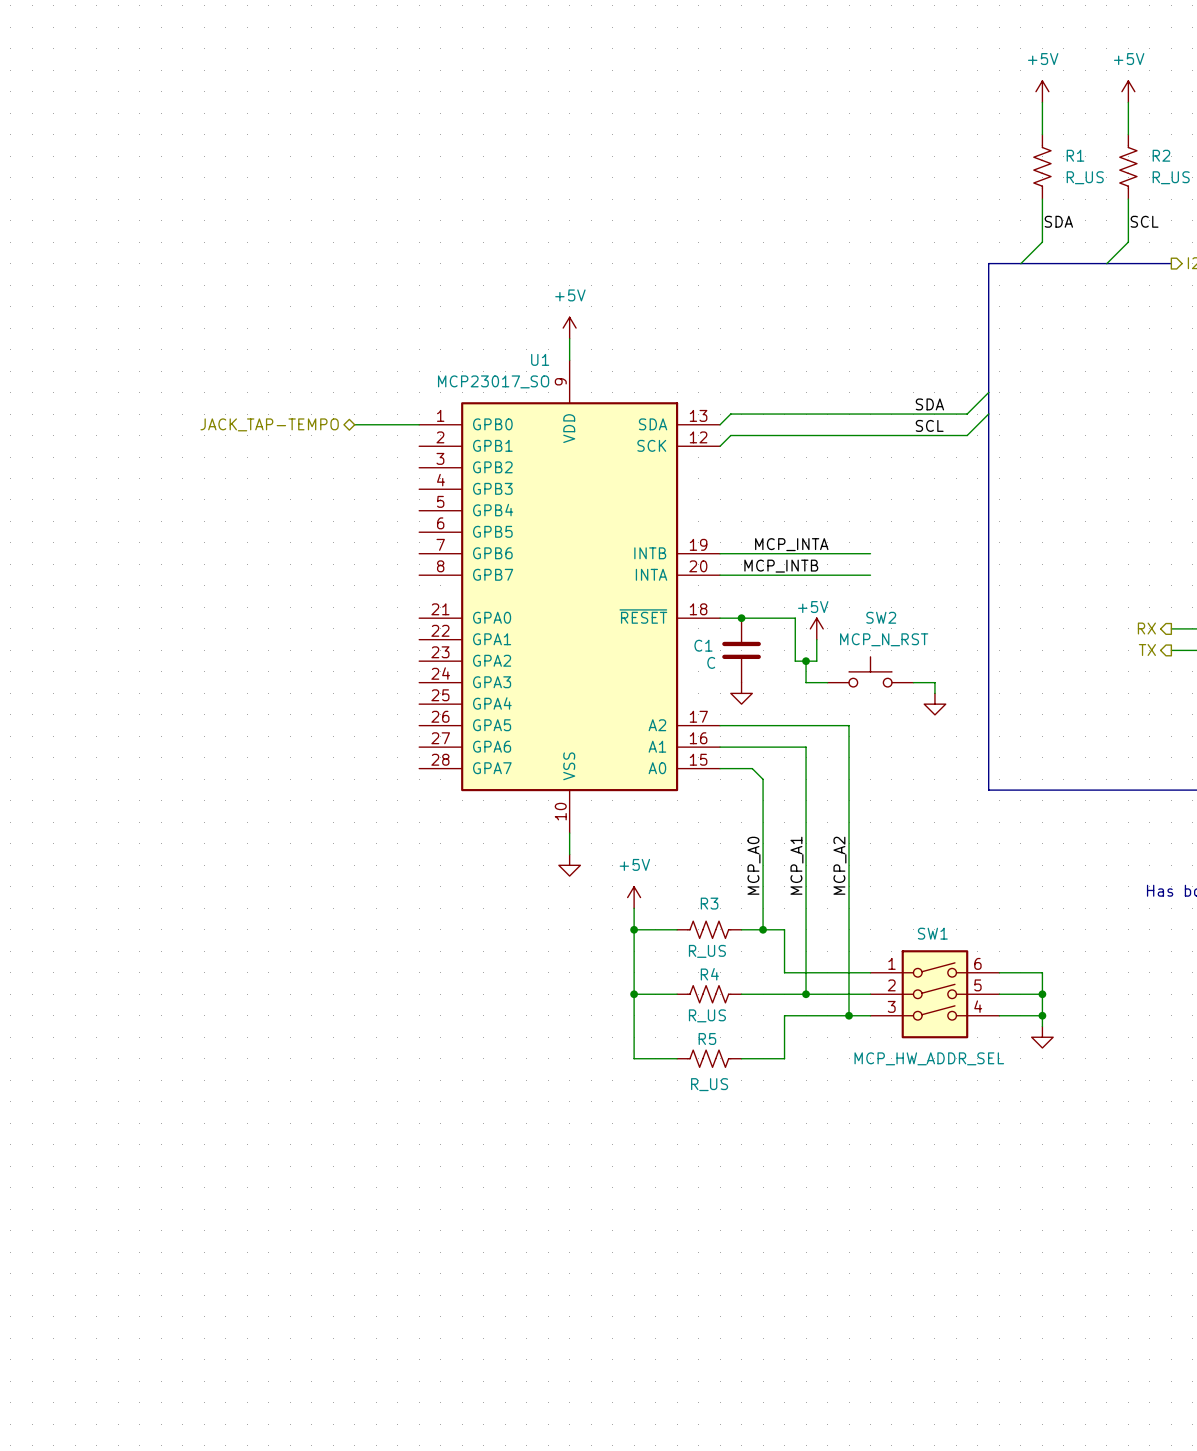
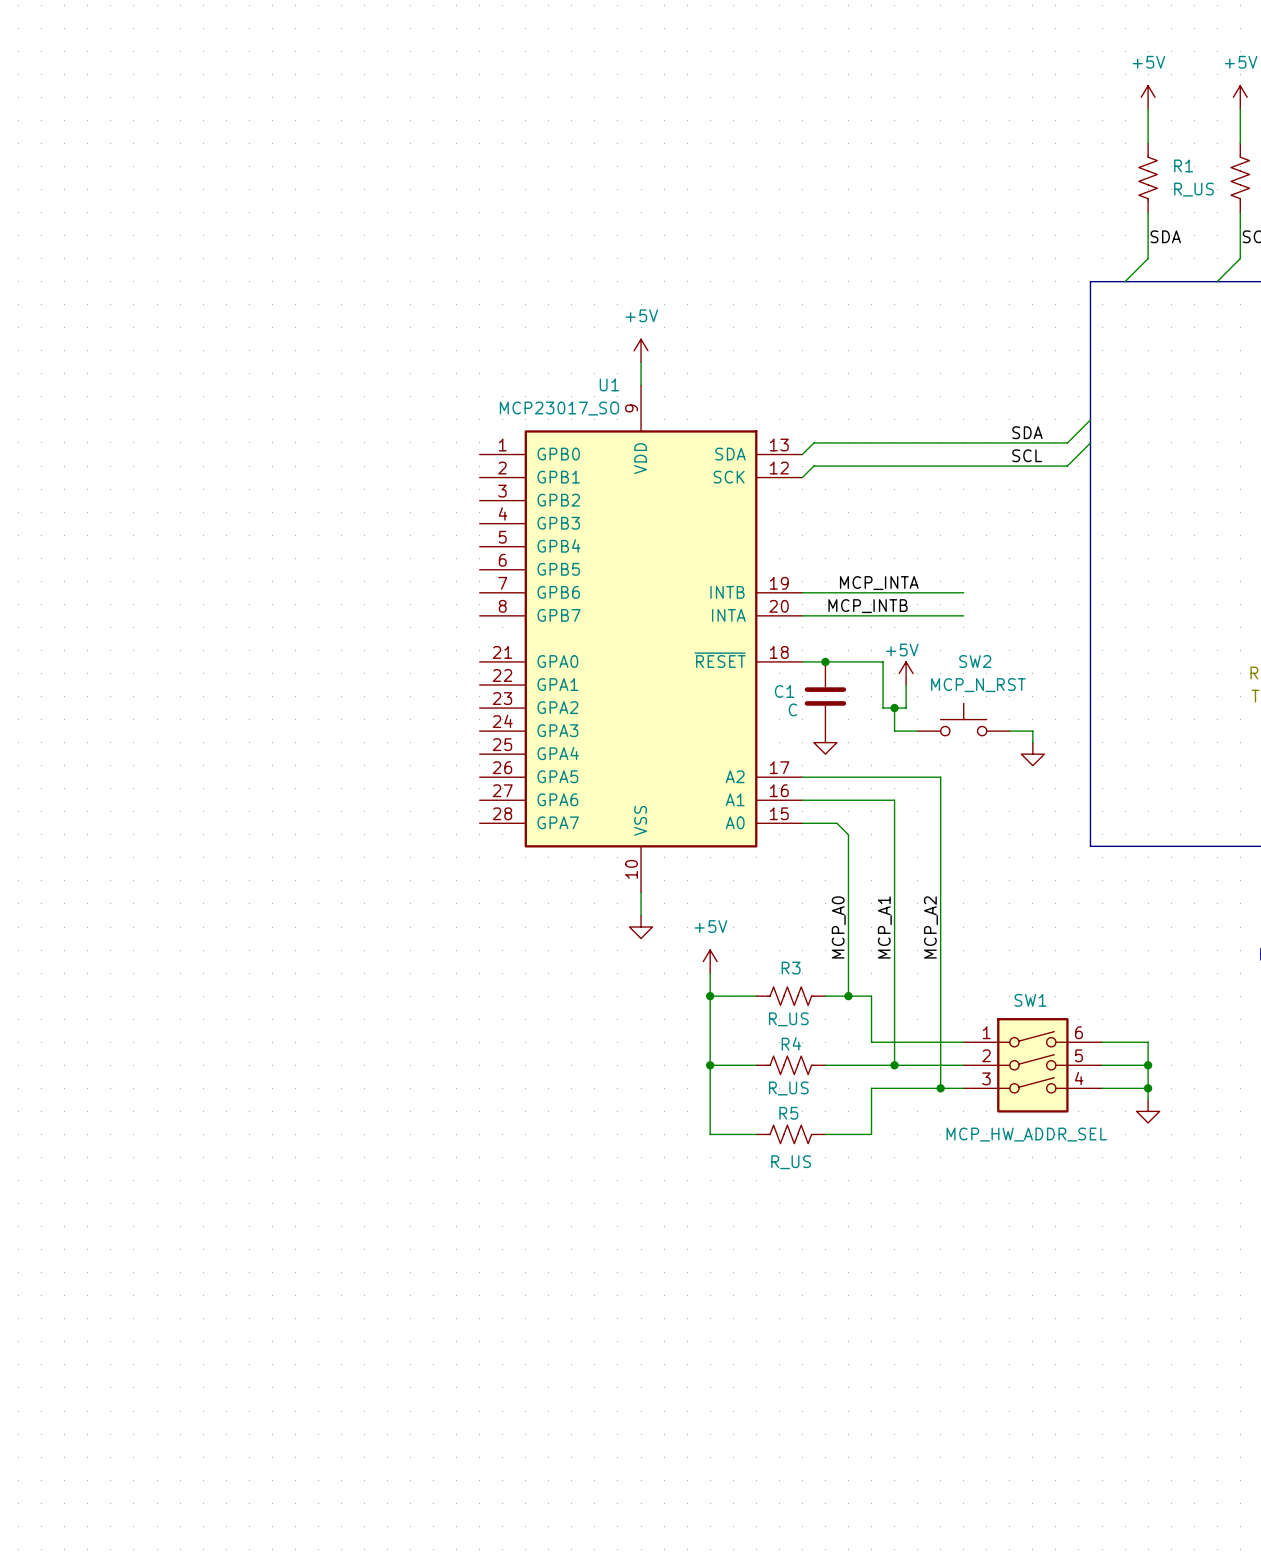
hierarchical label: JACK_TAP-TEMPO (269, 424) -> none
wire: (354, 424) (419, 424) -> none

